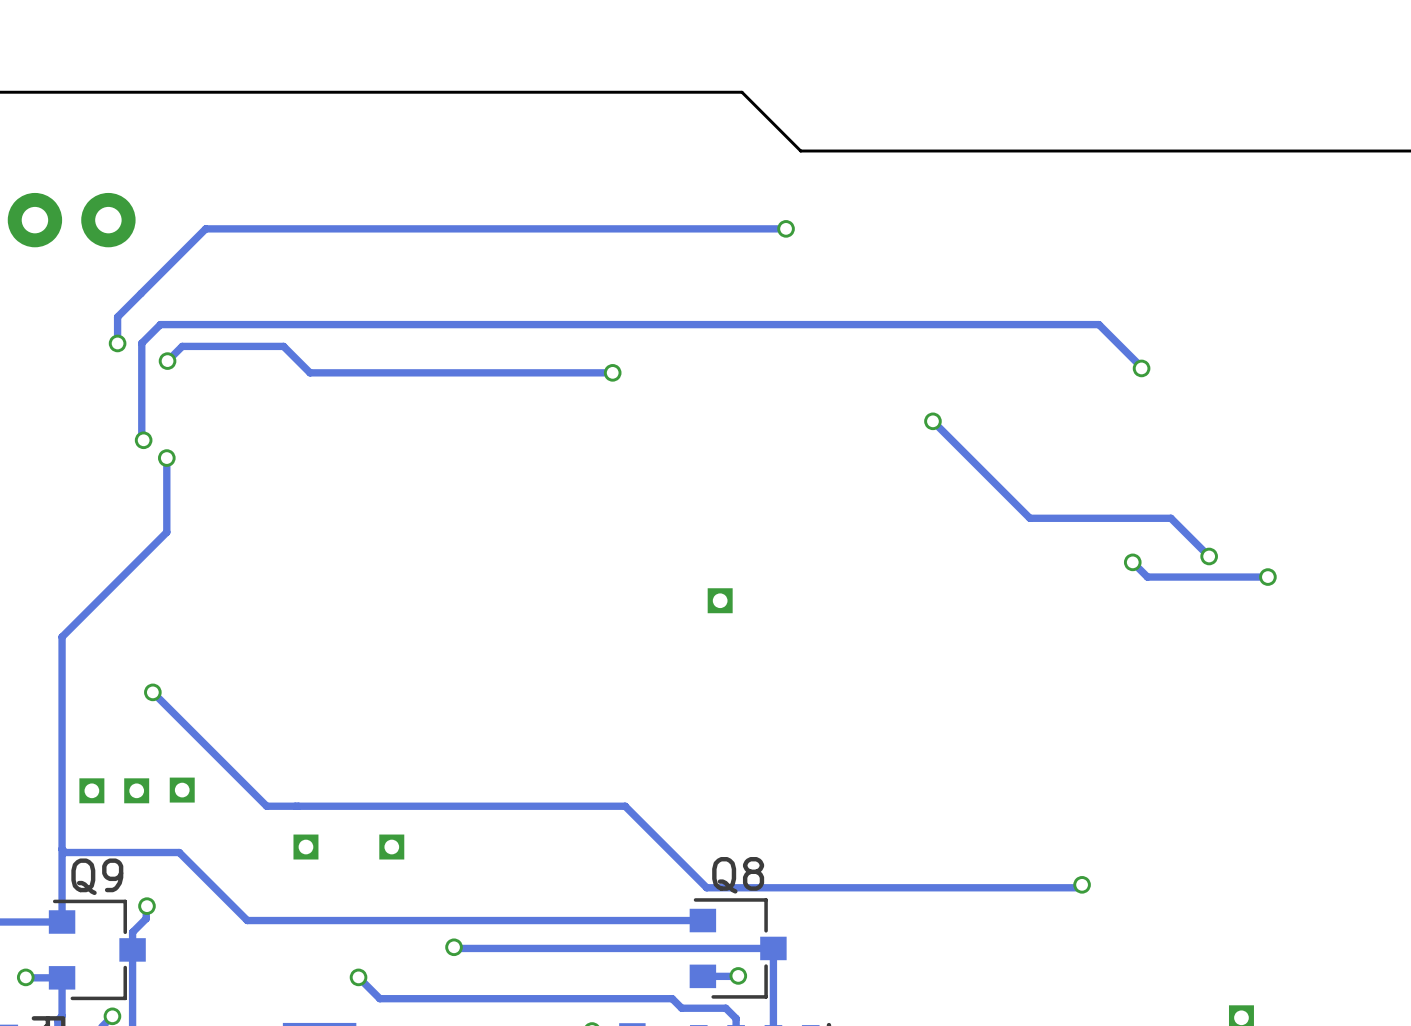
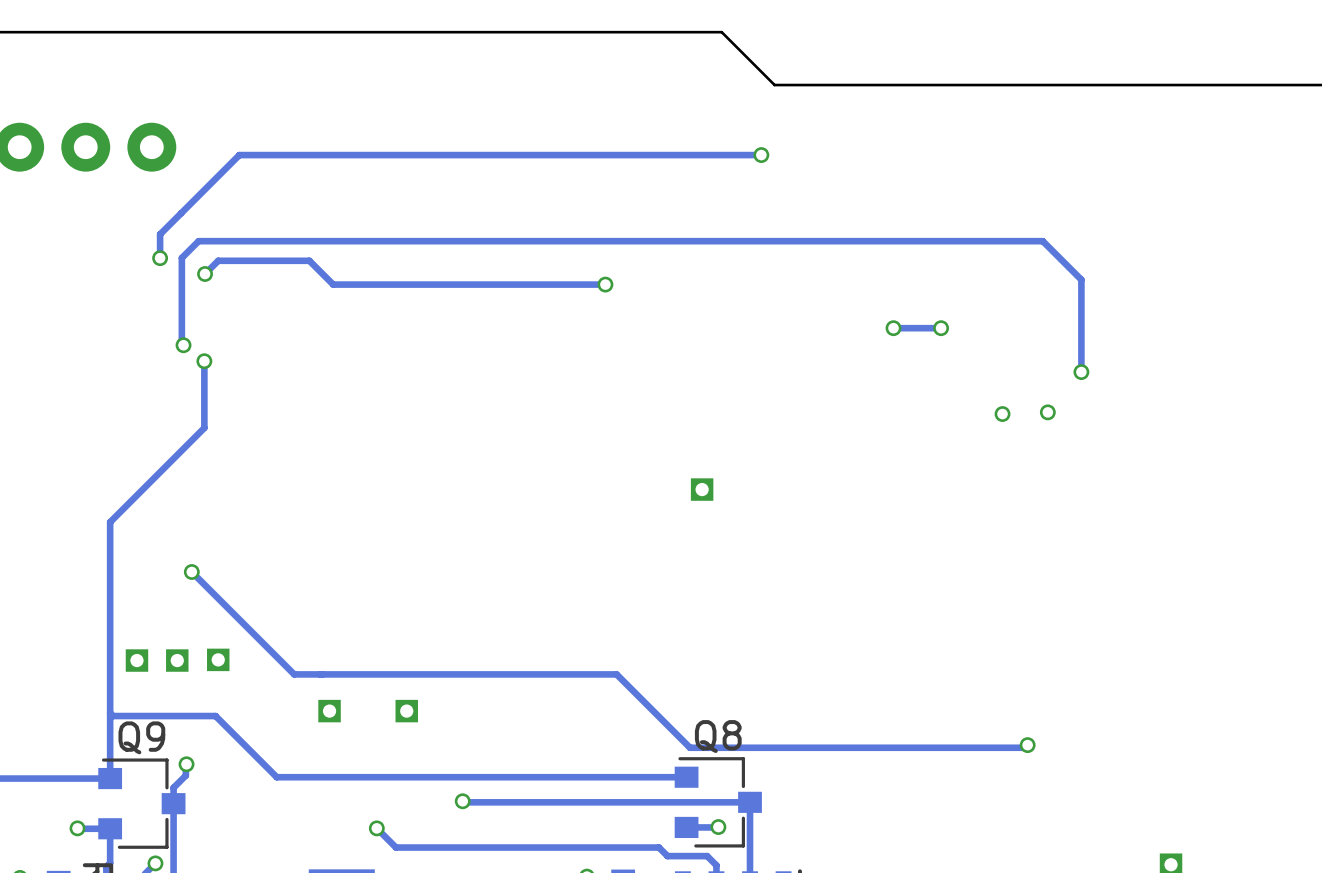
track: none -> (1081, 280) (1081, 372)
via: (1141, 368) -> none
track: (932, 421) (1029, 518) (1170, 518) (1209, 556) -> (893, 328) (941, 328)
via: none -> (941, 328)
via: none -> (1081, 372)
via: none -> (1047, 412)
via: none -> (1002, 414)
via: (1209, 556) -> none
track: (1132, 562) (1147, 577) (1267, 577) -> none
via: (1132, 562) -> none
via: (1267, 577) -> none

